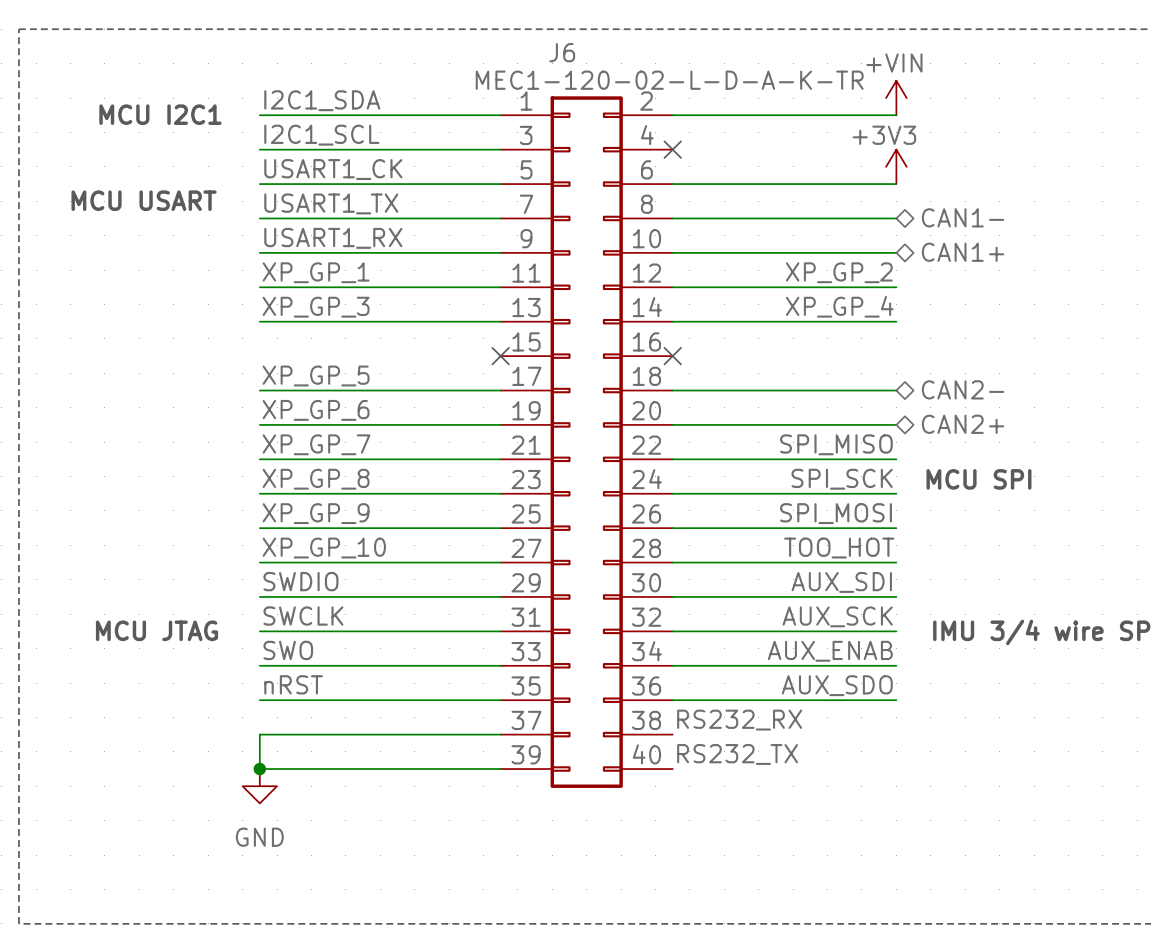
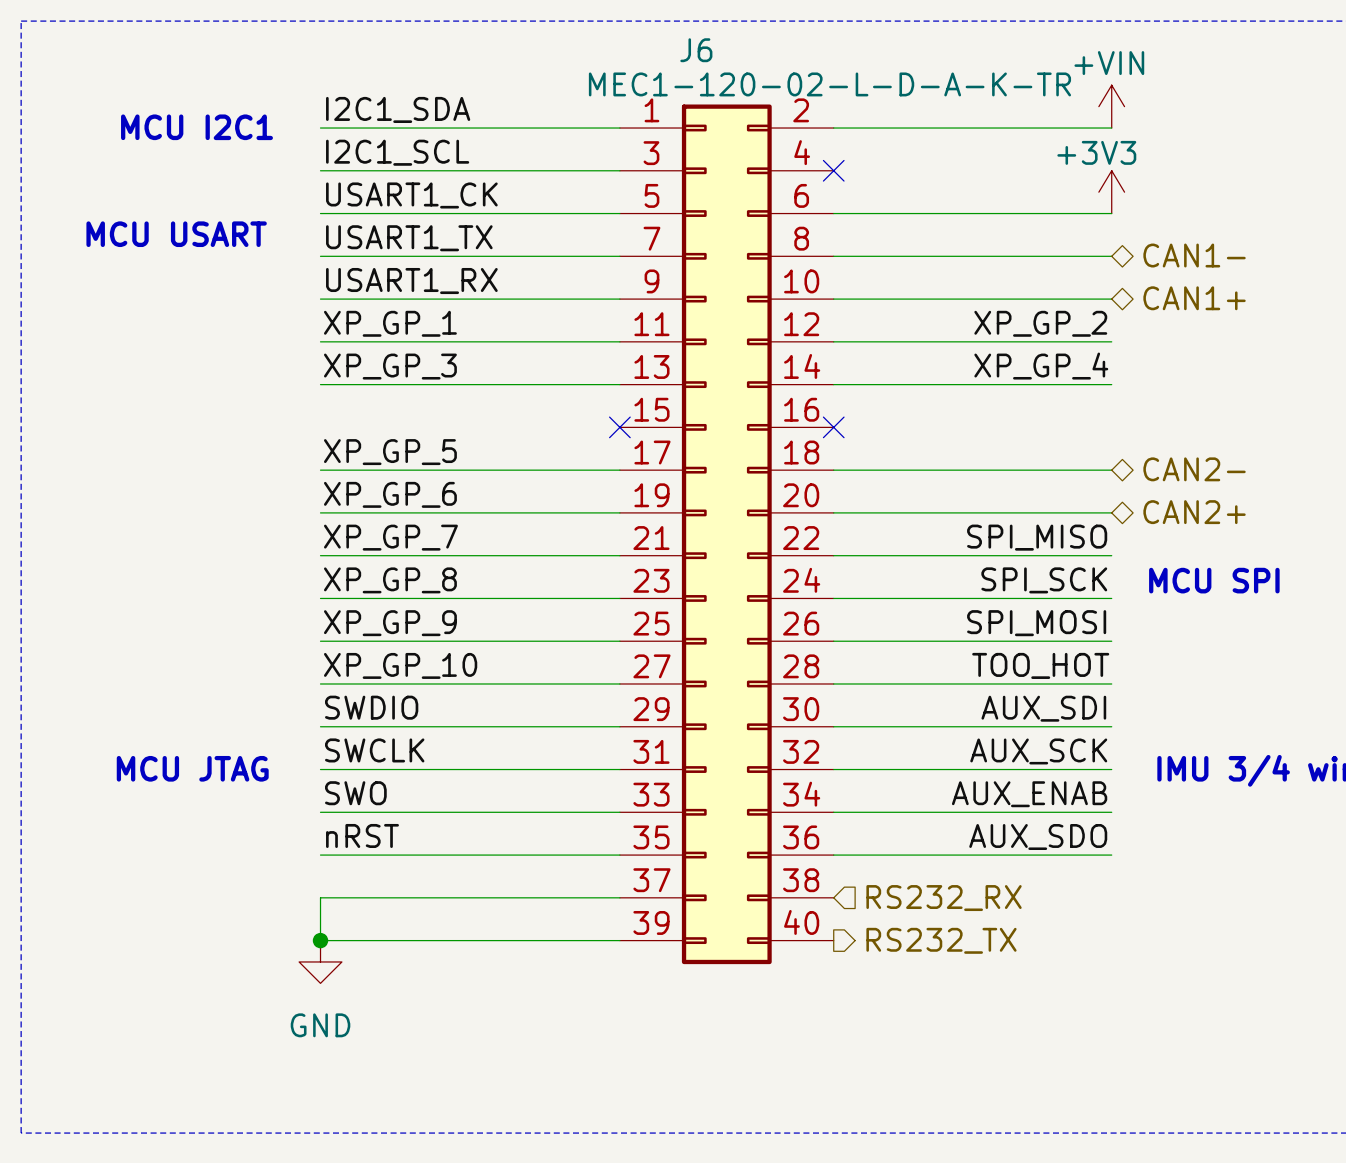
label: RS232_RX (739, 720) -> none
hierarchical label: none -> RS232_RX (944, 898)
label: RS232_TX (737, 754) -> none
hierarchical label: none -> RS232_TX (941, 940)

